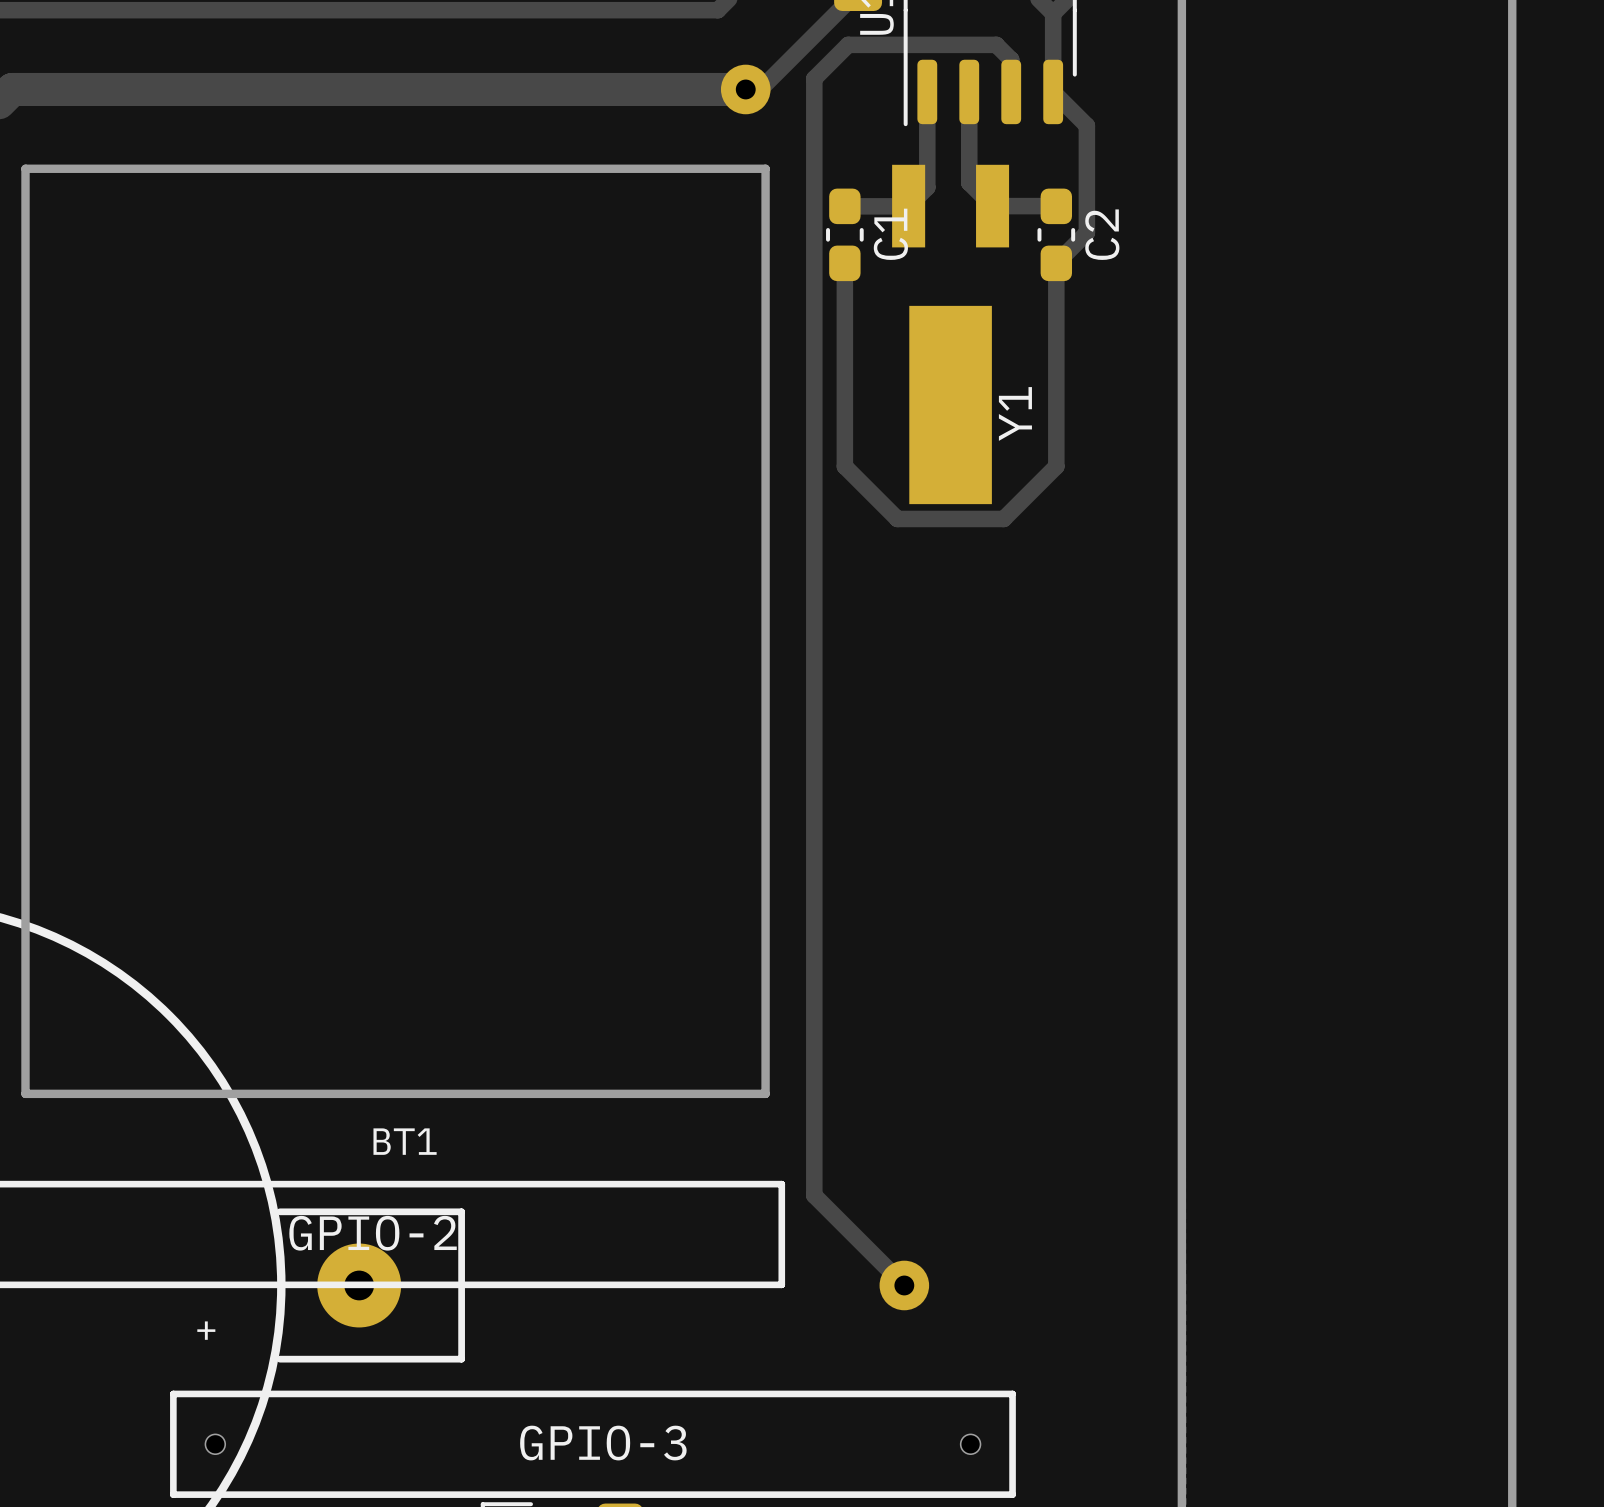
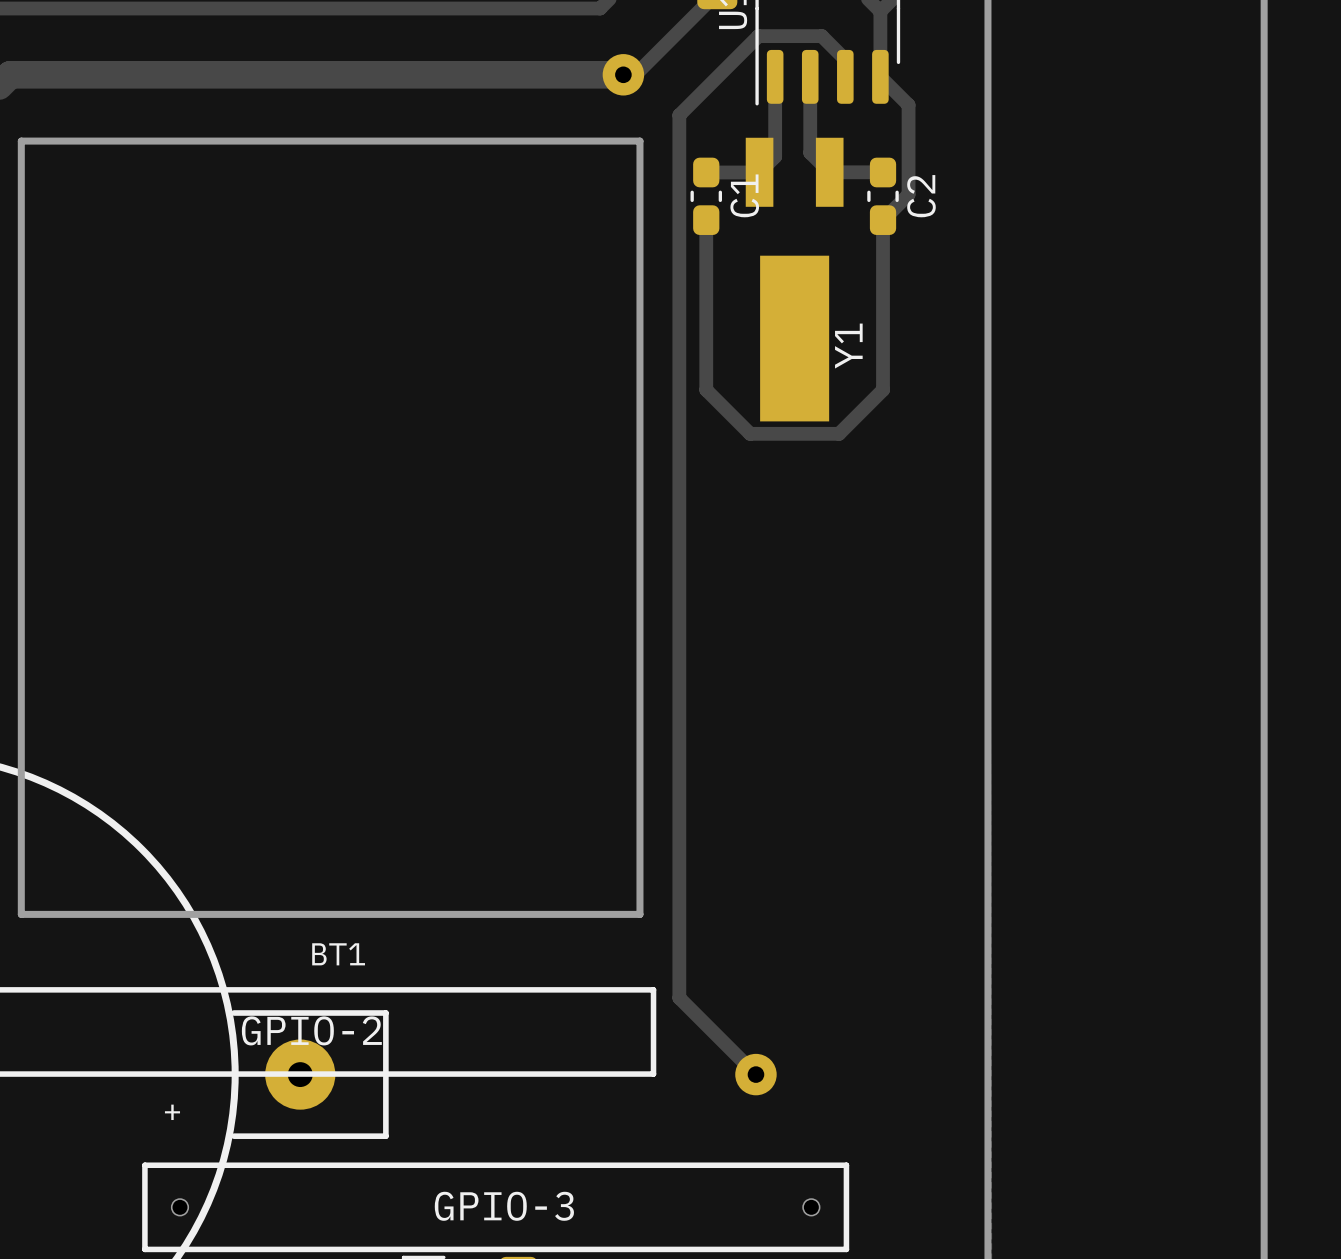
track: (1011, 71) (1011, 59) (996, 44) (848, 44) (814, 78) (814, 1195) -> (845, 59) (821, 36) (758, 36) (679, 115) (680, 999)

